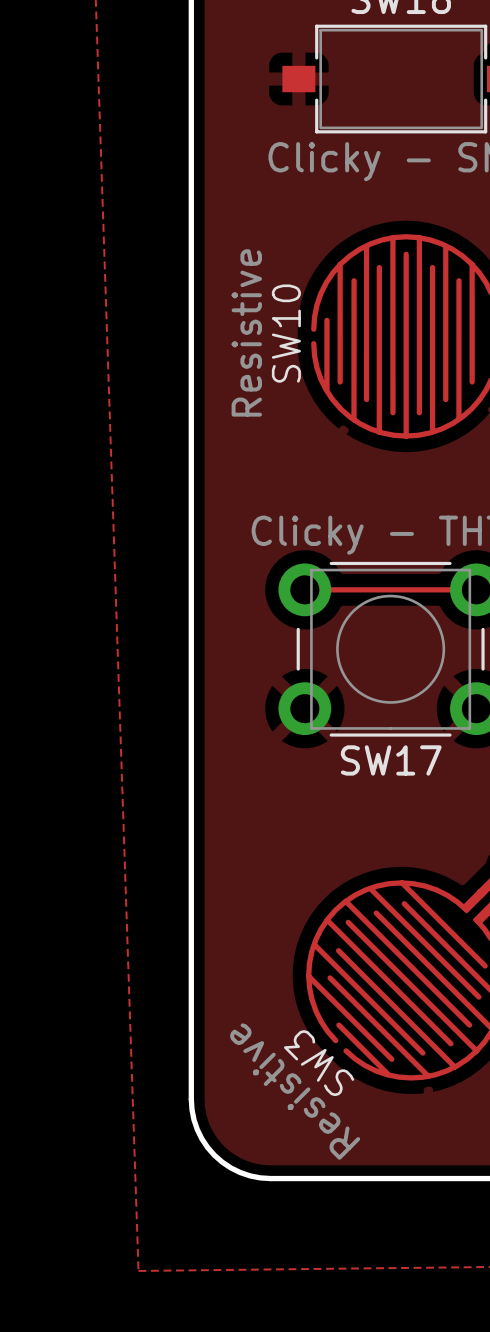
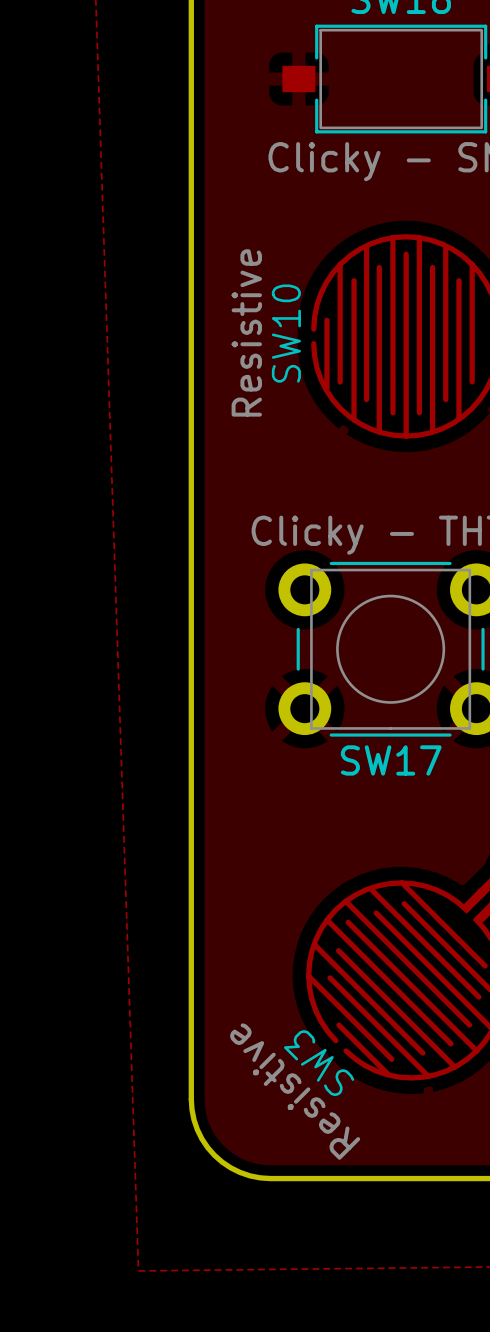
track: (304, 589) (476, 589) -> none

